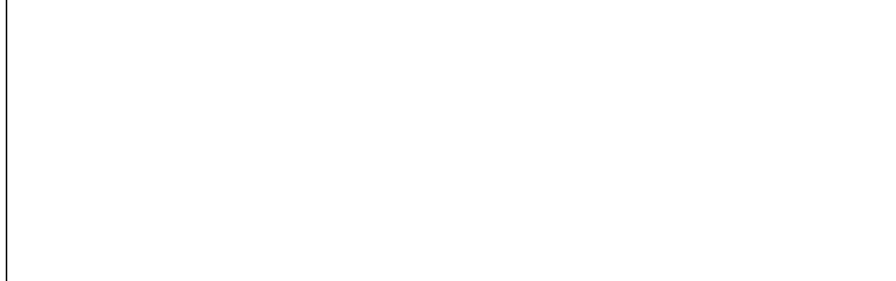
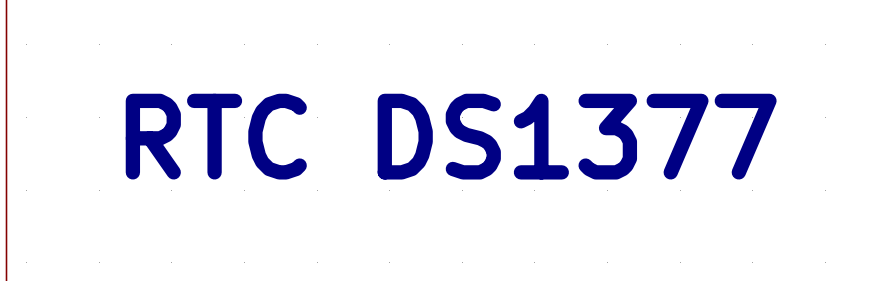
text: none -> RTC DS1377 (451, 136)

